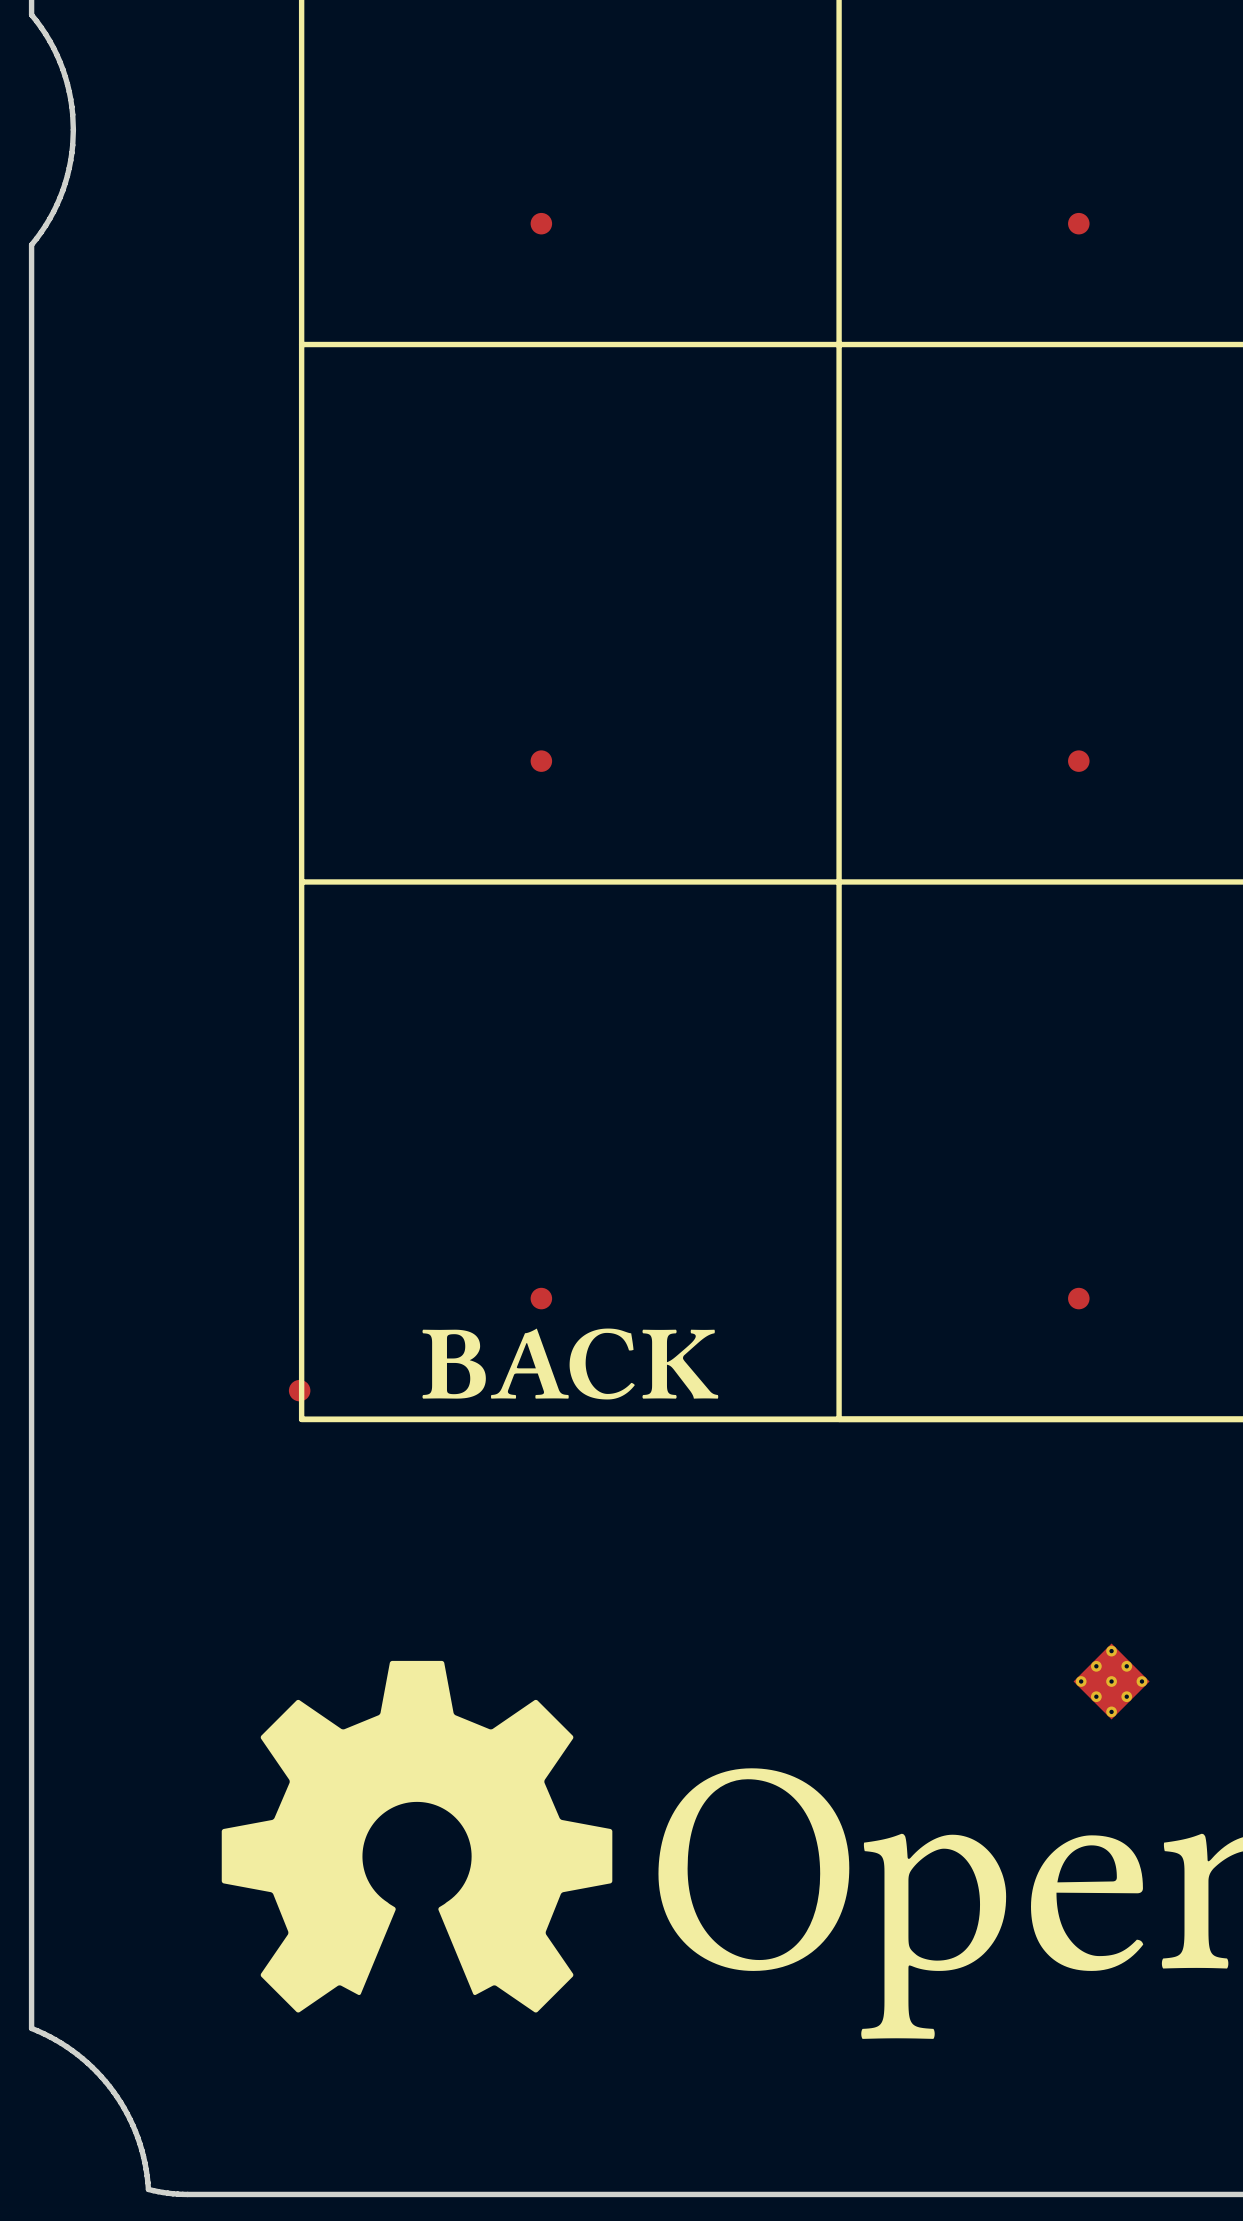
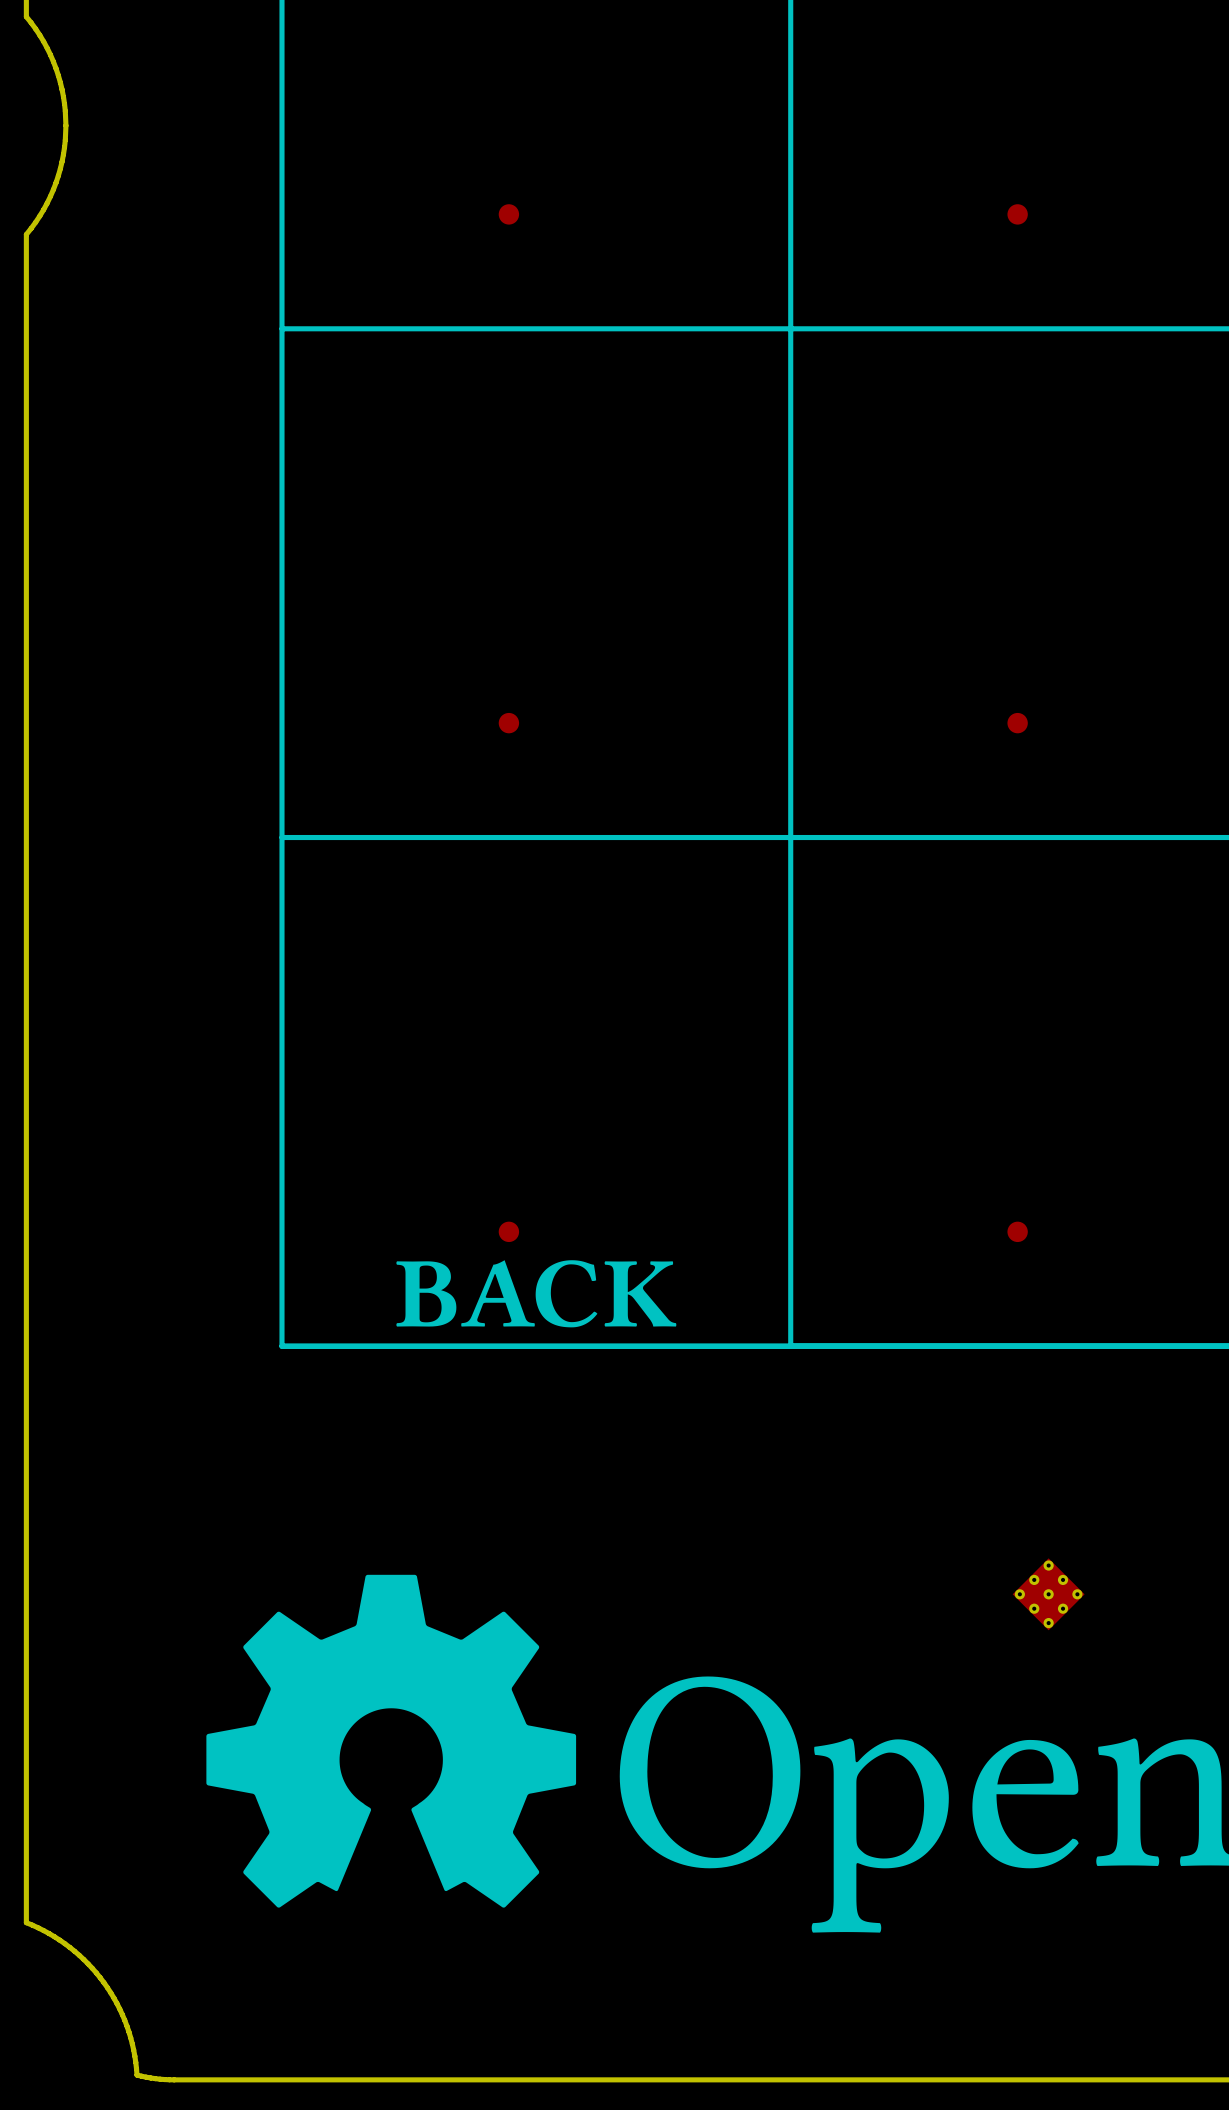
part: (299, 1390) -> none

